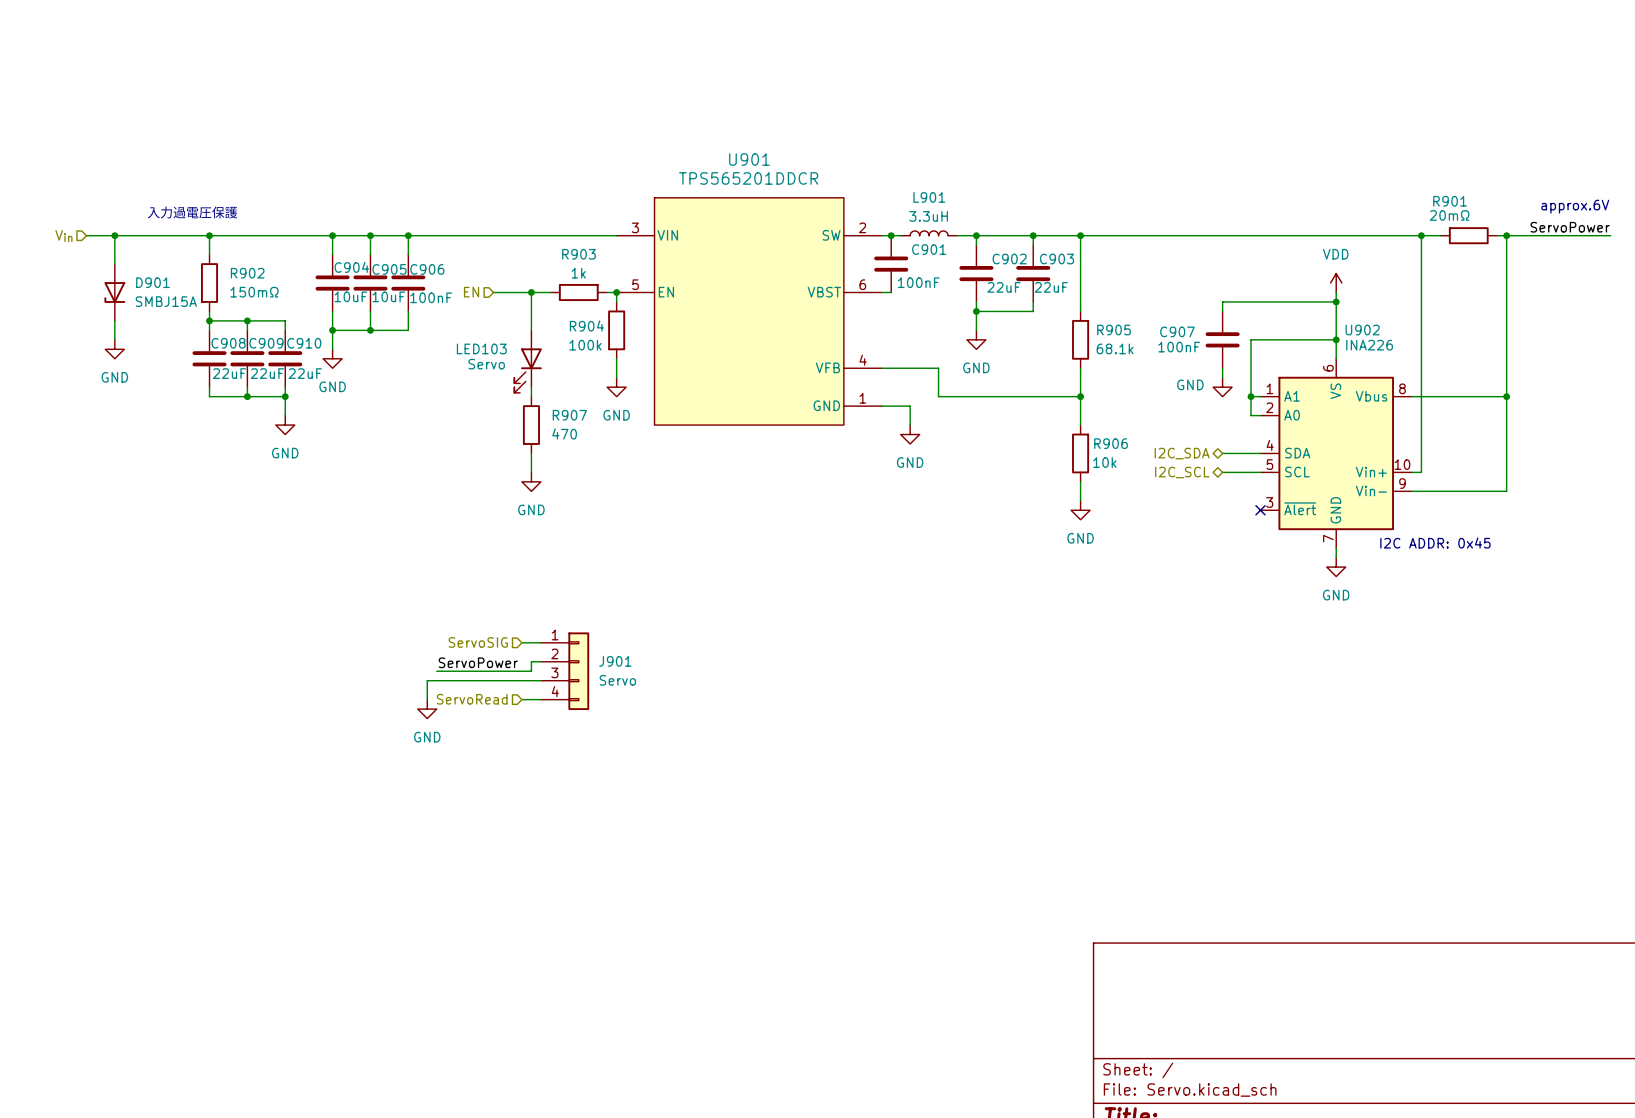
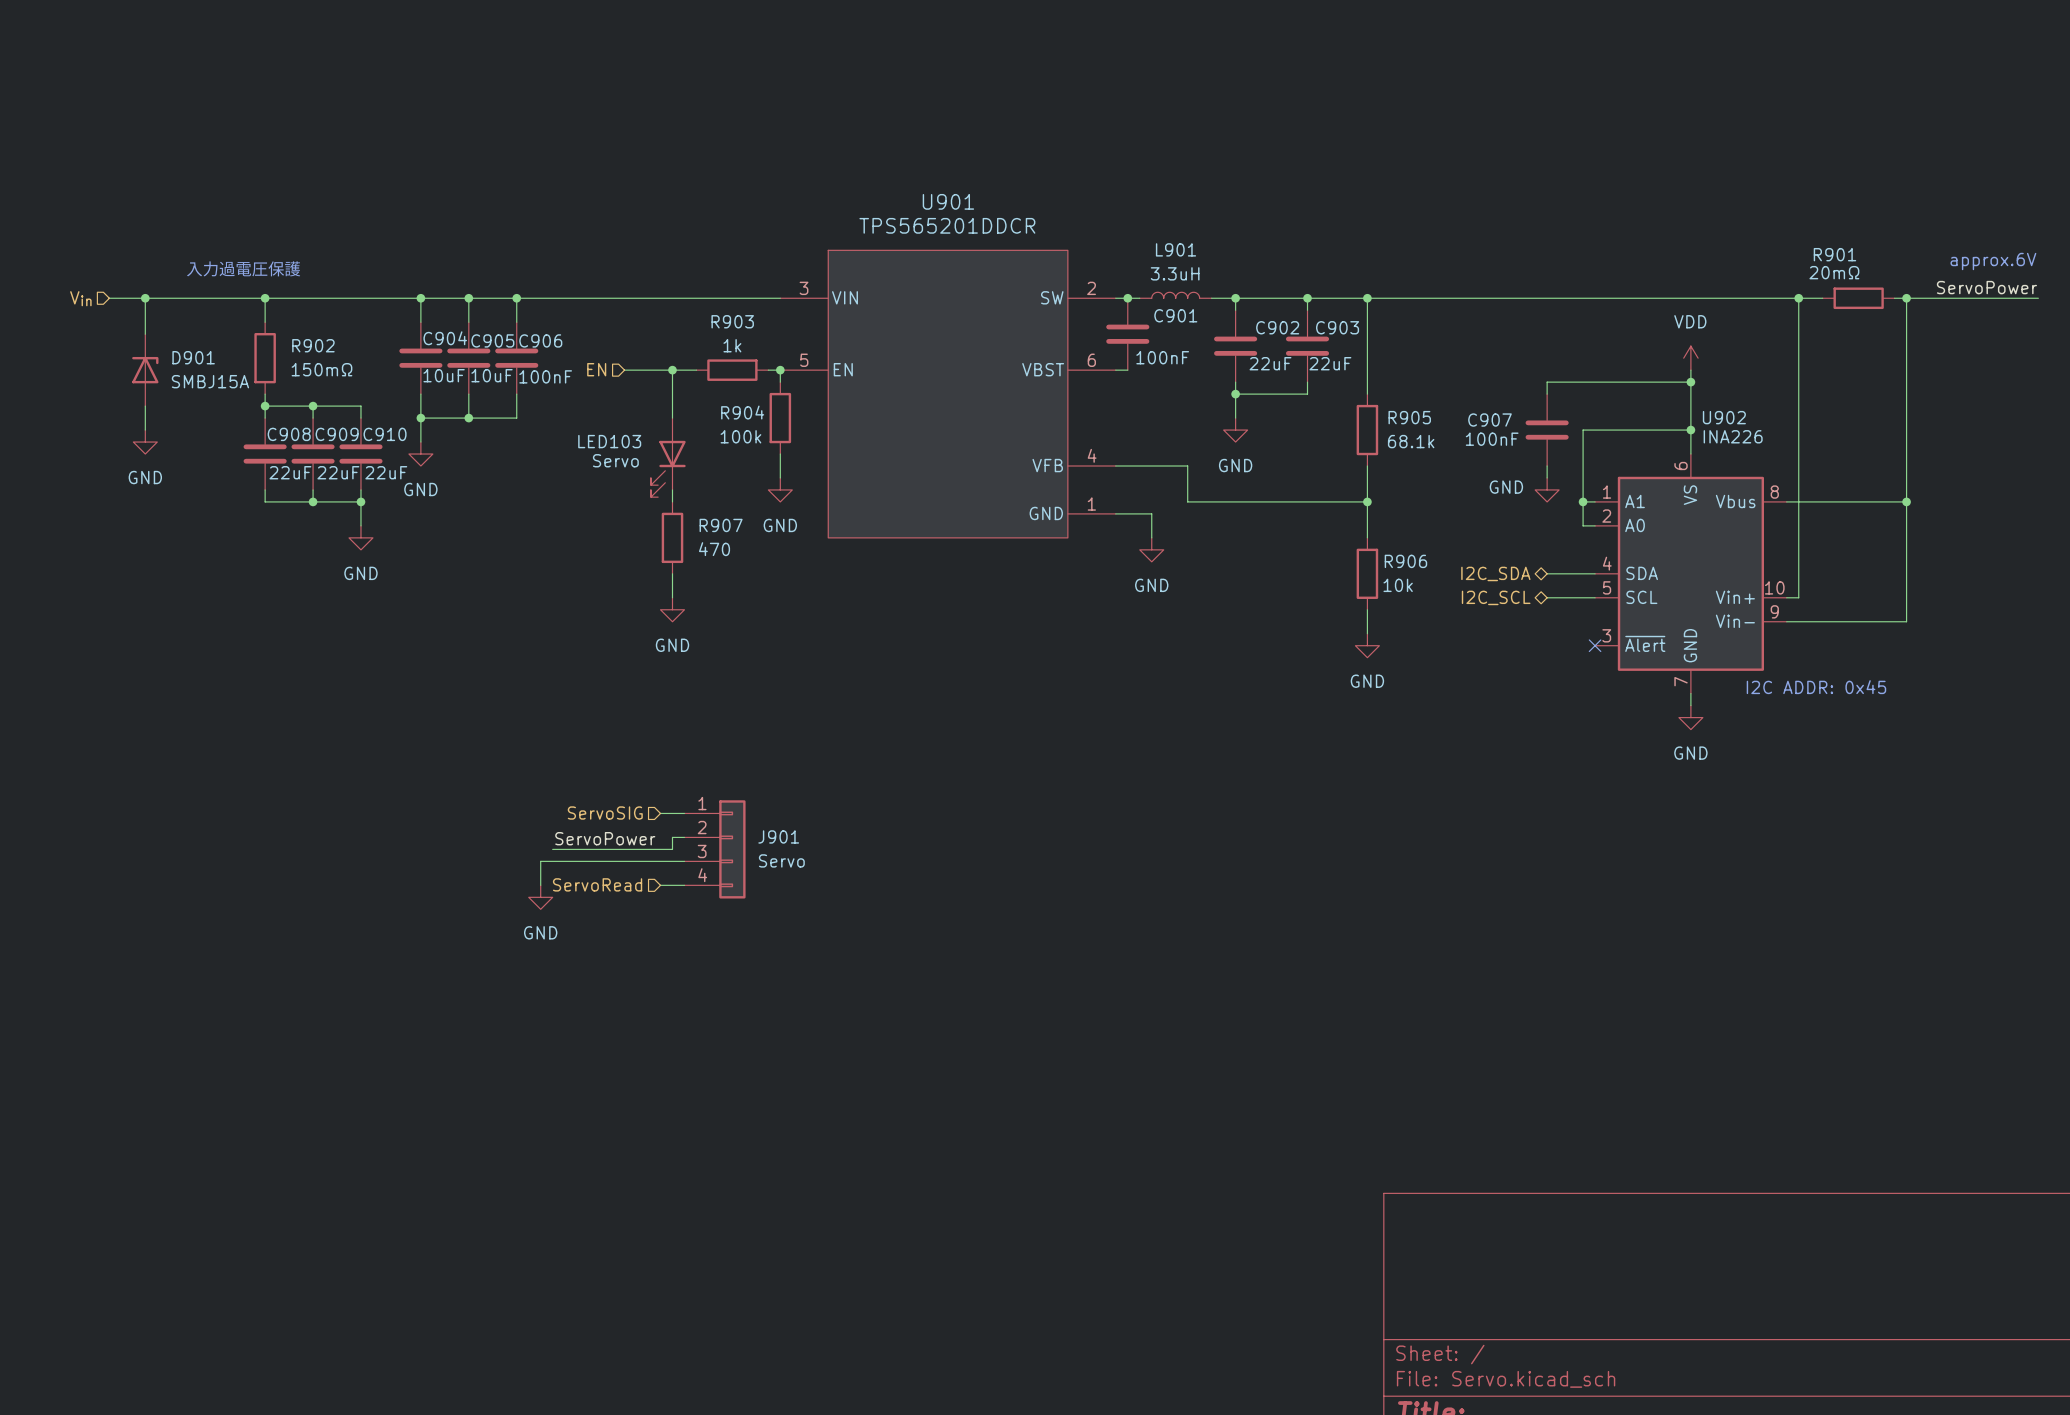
D901 rotation: 0° (114, 292) -> 180° (145, 370)

